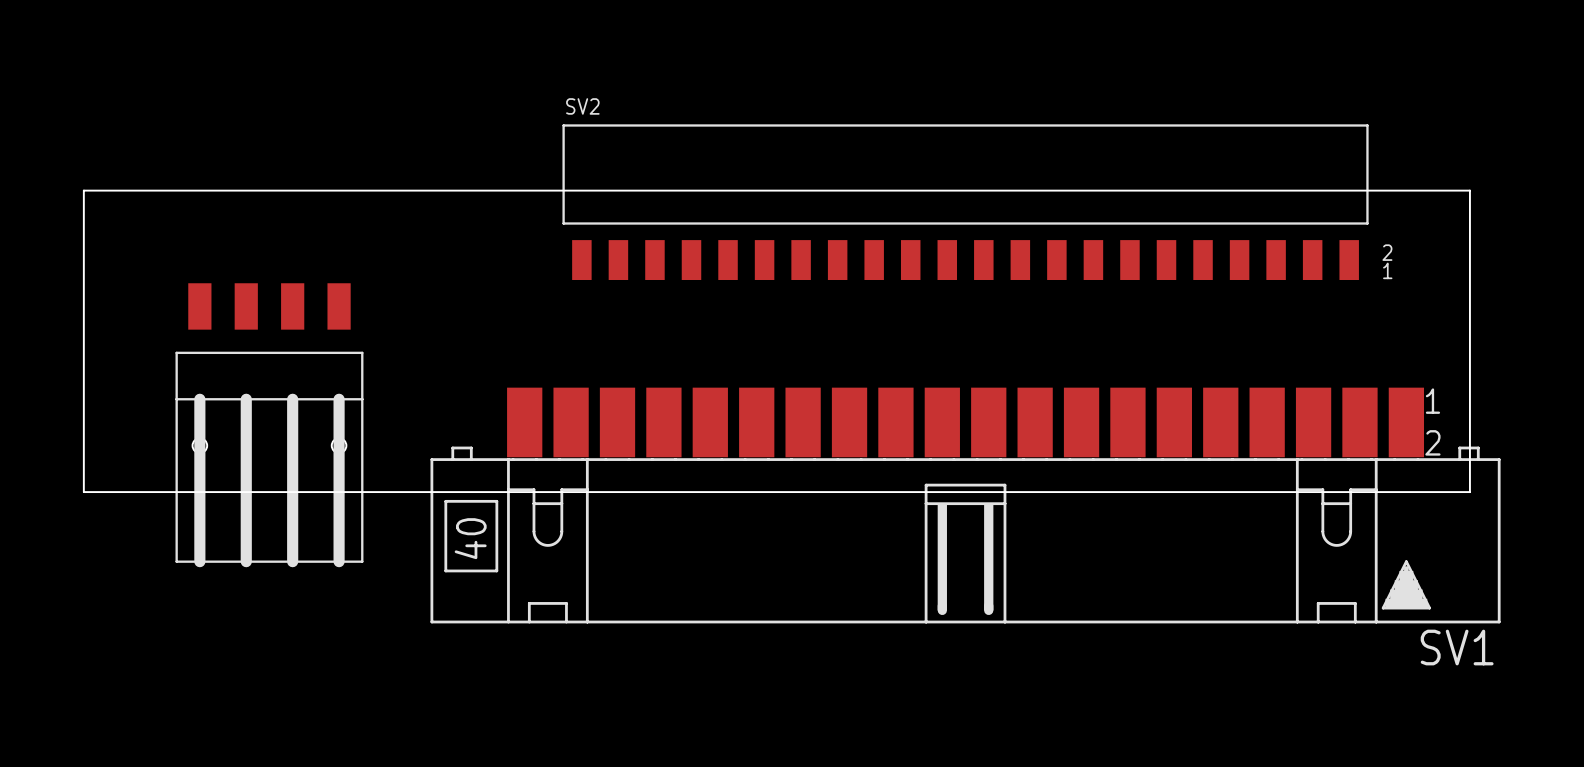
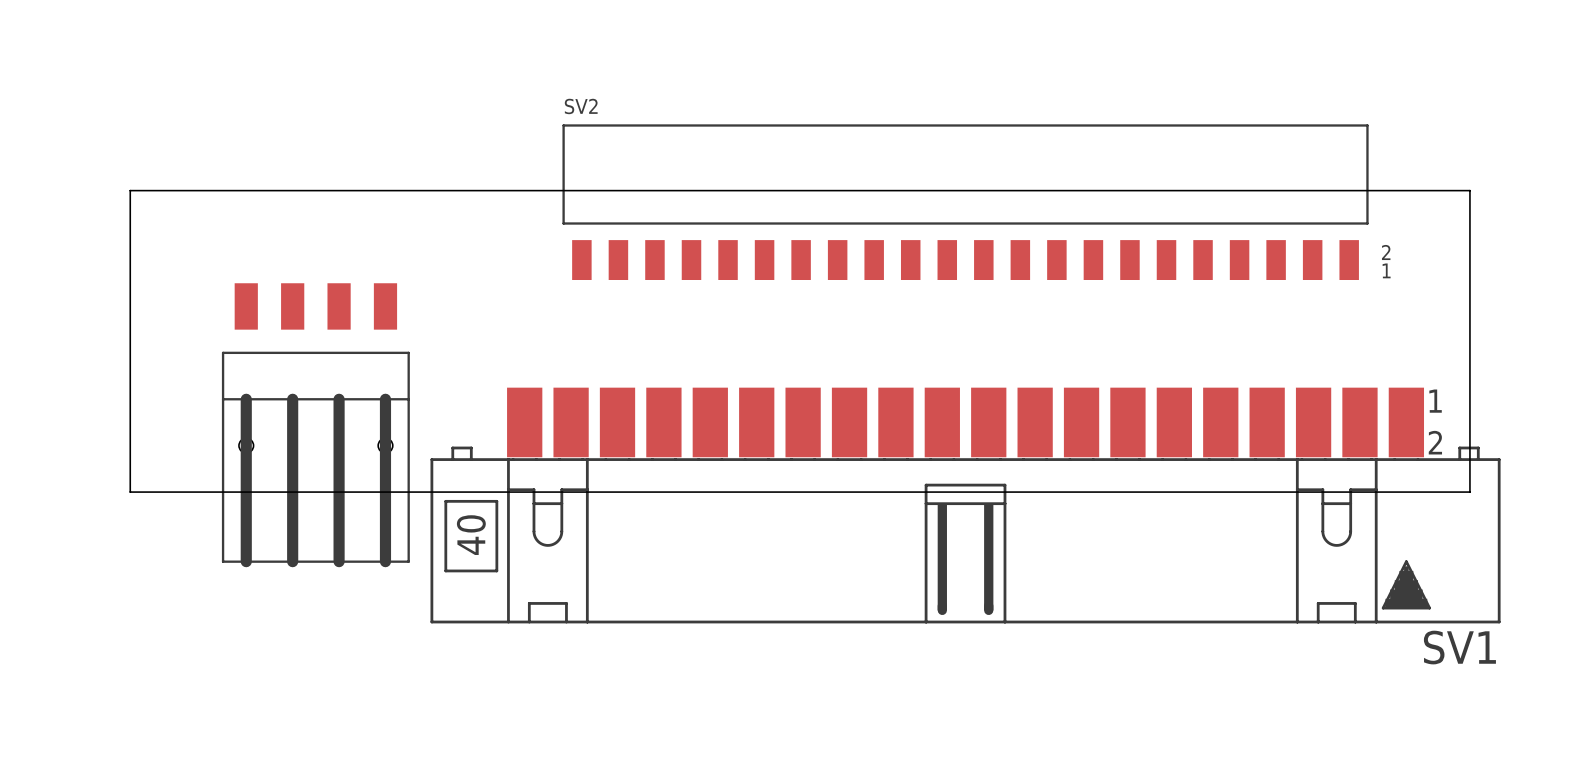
board edge: (130, 190) (83, 190) (83, 492) (130, 492) -> (130, 190) (130, 492)
part position: (269, 425) -> (315, 425)

